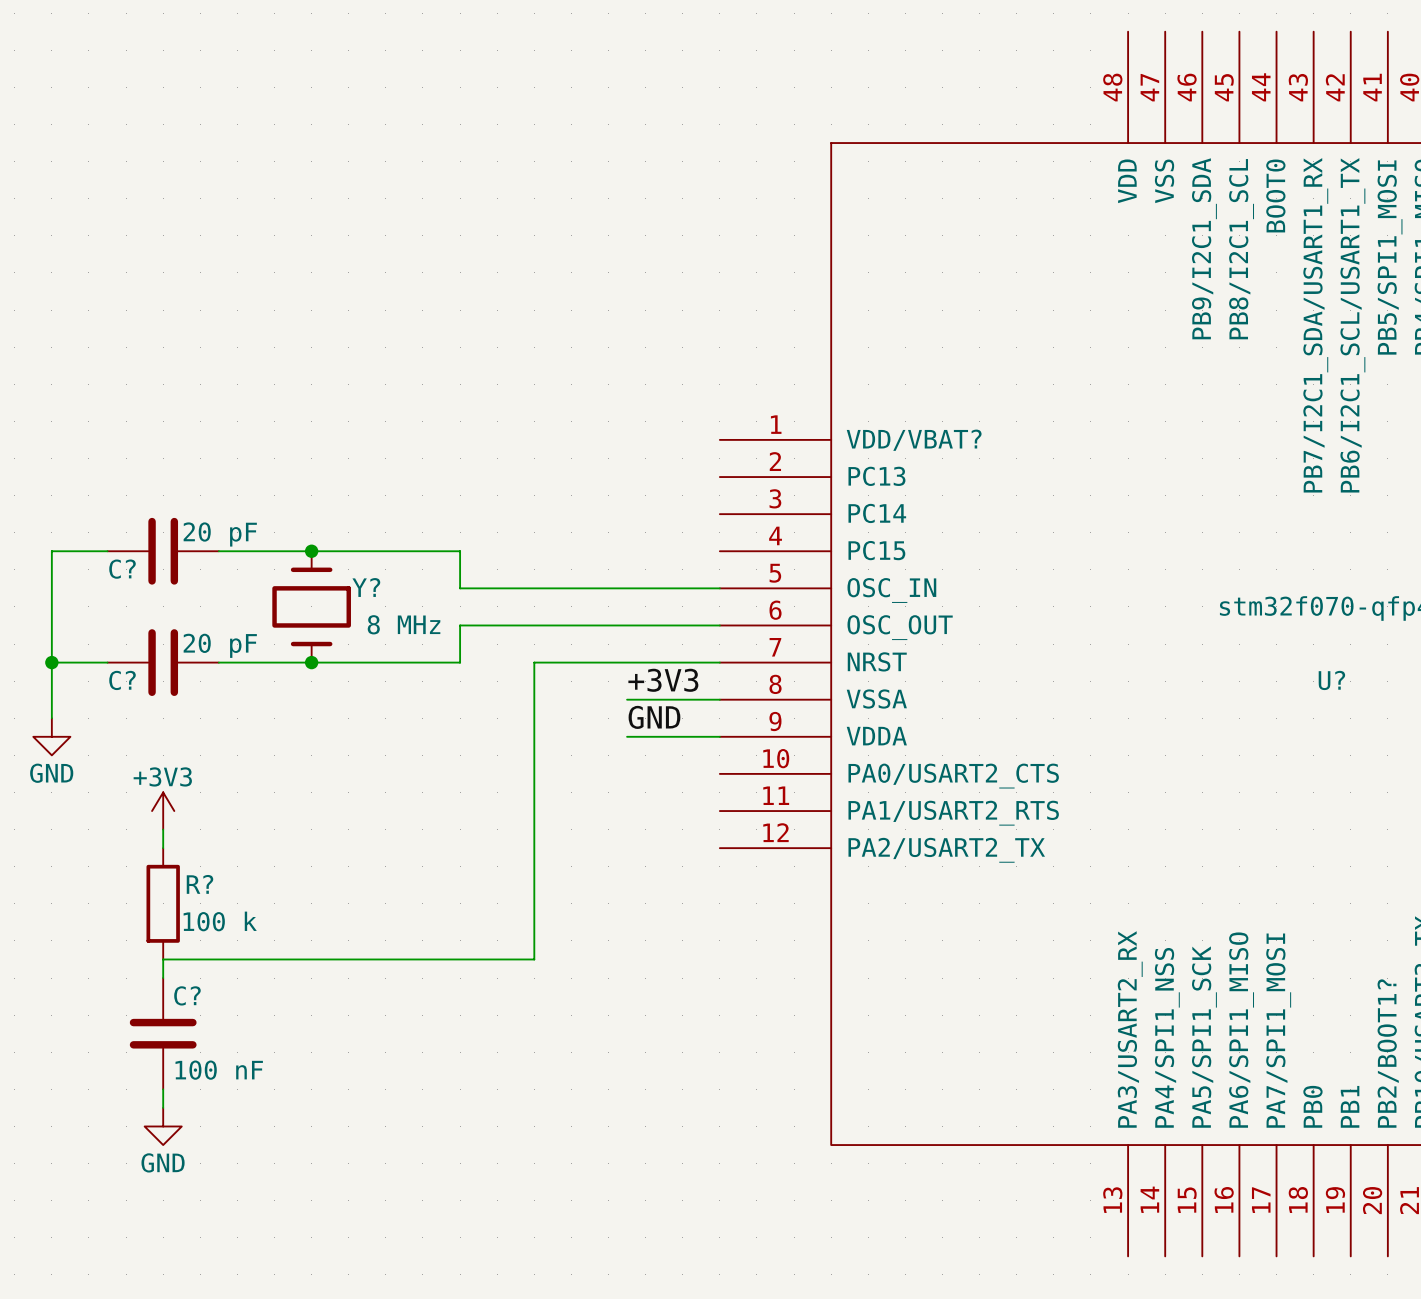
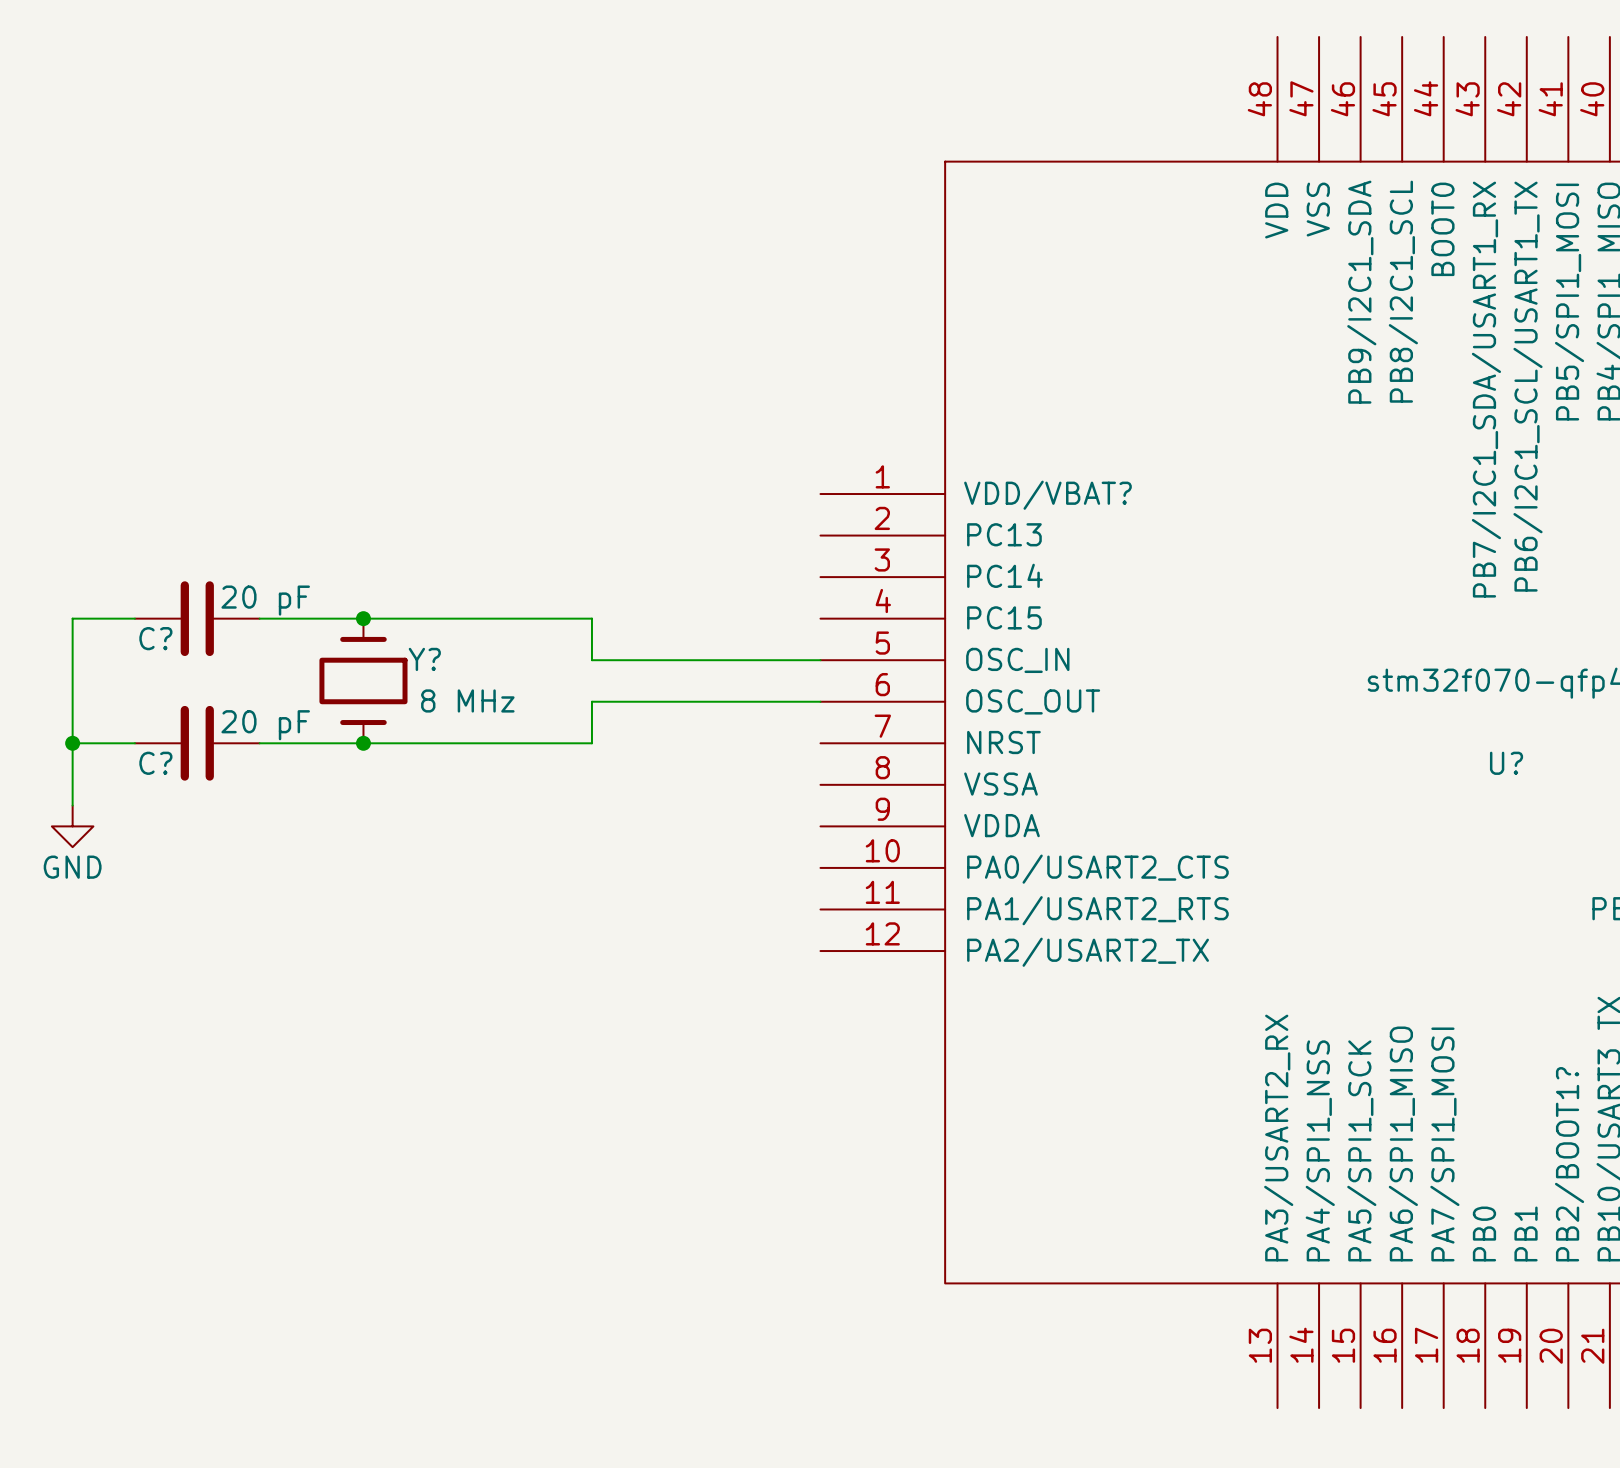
wire: (460, 551) (460, 588) (515, 588) -> (529, 618) (591, 618) (591, 660)
wire: (515, 625) (460, 625) (460, 662) -> (591, 701) (591, 743) (529, 743)
wire: (719, 662) (534, 662) (534, 959) (163, 959) (163, 978) -> none
label: +3V3 (663, 680) -> none
wire: (627, 699) (719, 699) -> none
label: GND (654, 717) -> none
wire: (627, 736) (719, 736) -> none
power symbol: +3V3 (163, 811) -> none
wire: (163, 829) (163, 848) -> none
R?: 100 k (163, 903) -> none
C?: 100 nF (163, 1033) -> none
wire: (163, 1089) (163, 1107) -> none
power symbol: GND (163, 1126) -> none

